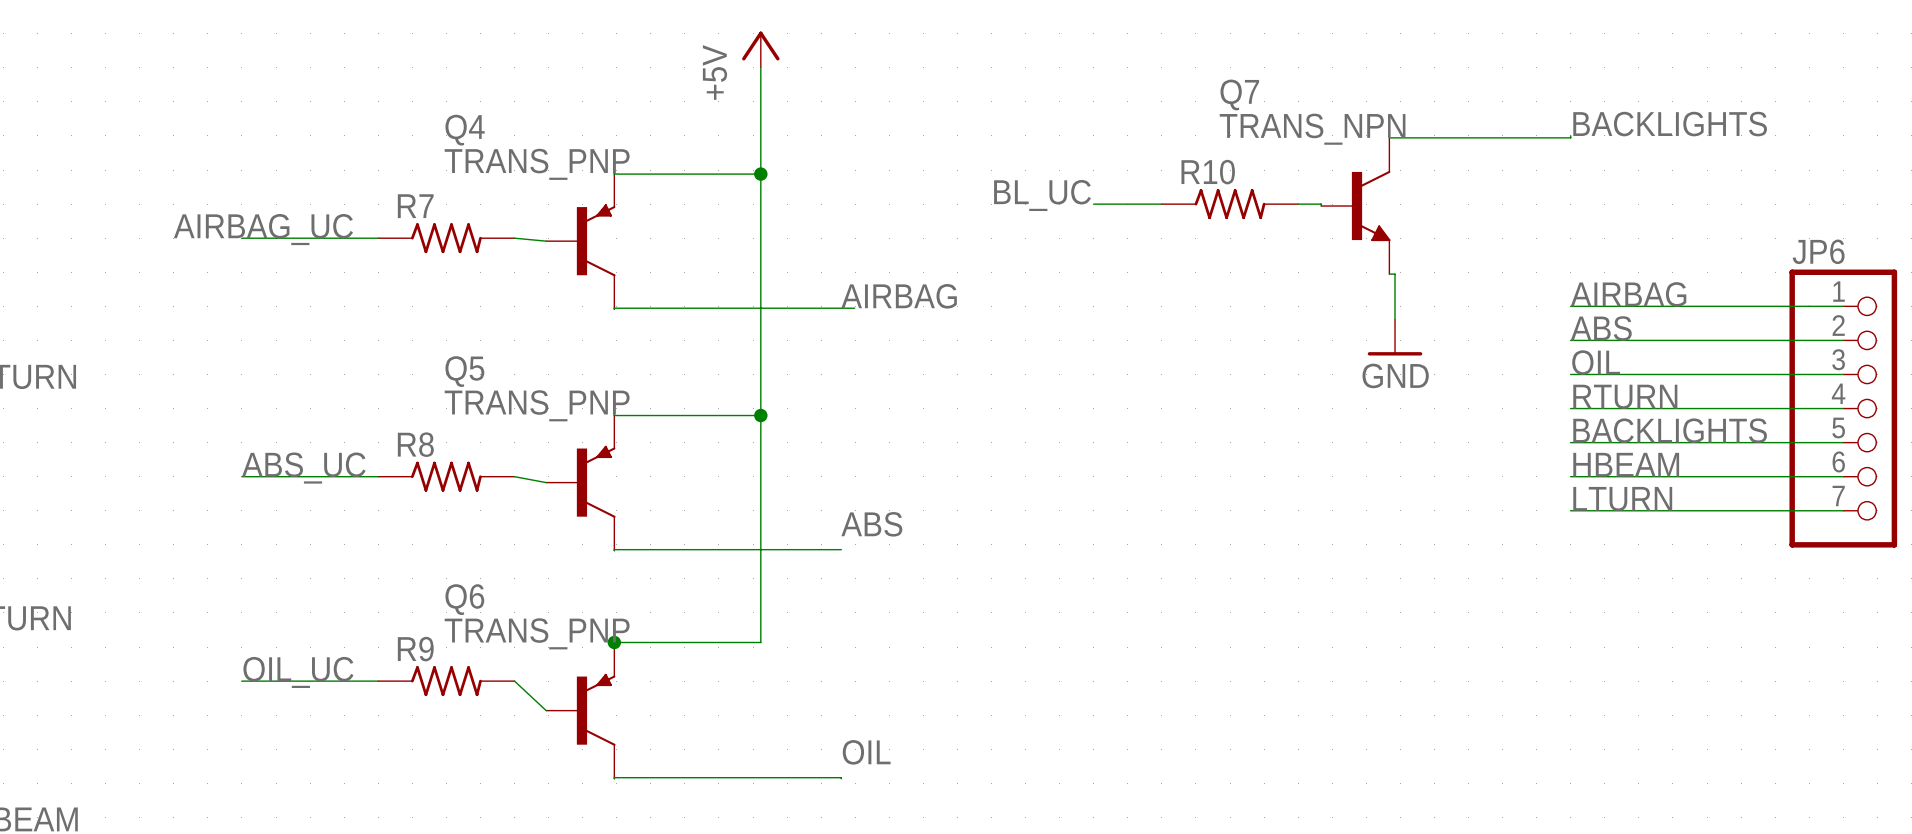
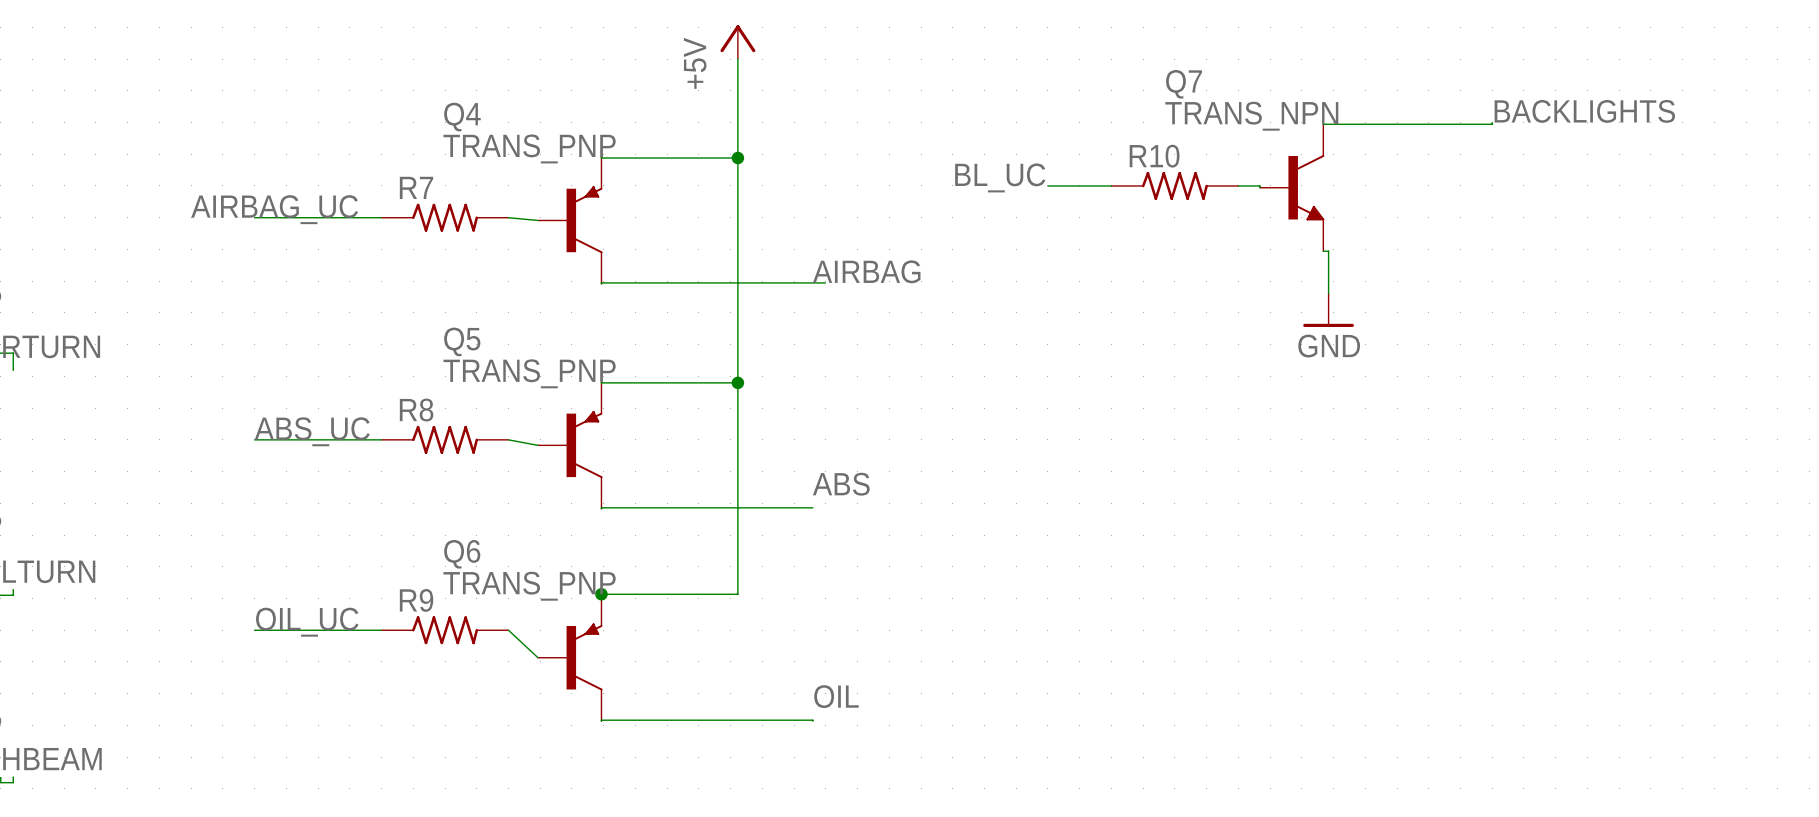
label: AIRBAG (1628, 294) -> none
wire: (1570, 306) (1843, 306) -> none
label: ABS (1601, 328) -> none
wire: (1570, 340) (1843, 340) -> none
label: OIL (1596, 362) -> none
wire: (1570, 374) (1843, 374) -> none
label: RTURN (1625, 396) -> none
wire: (1570, 408) (1843, 408) -> none
JP6: (1843, 408) -> none
label: BACKLIGHTS (1670, 430) -> none
wire: (1570, 442) (1843, 442) -> none
label: HBEAM (1626, 464) -> none
wire: (1570, 476) (1843, 476) -> none
label: LTURN (1622, 499) -> none
wire: (1570, 510) (1843, 510) -> none

